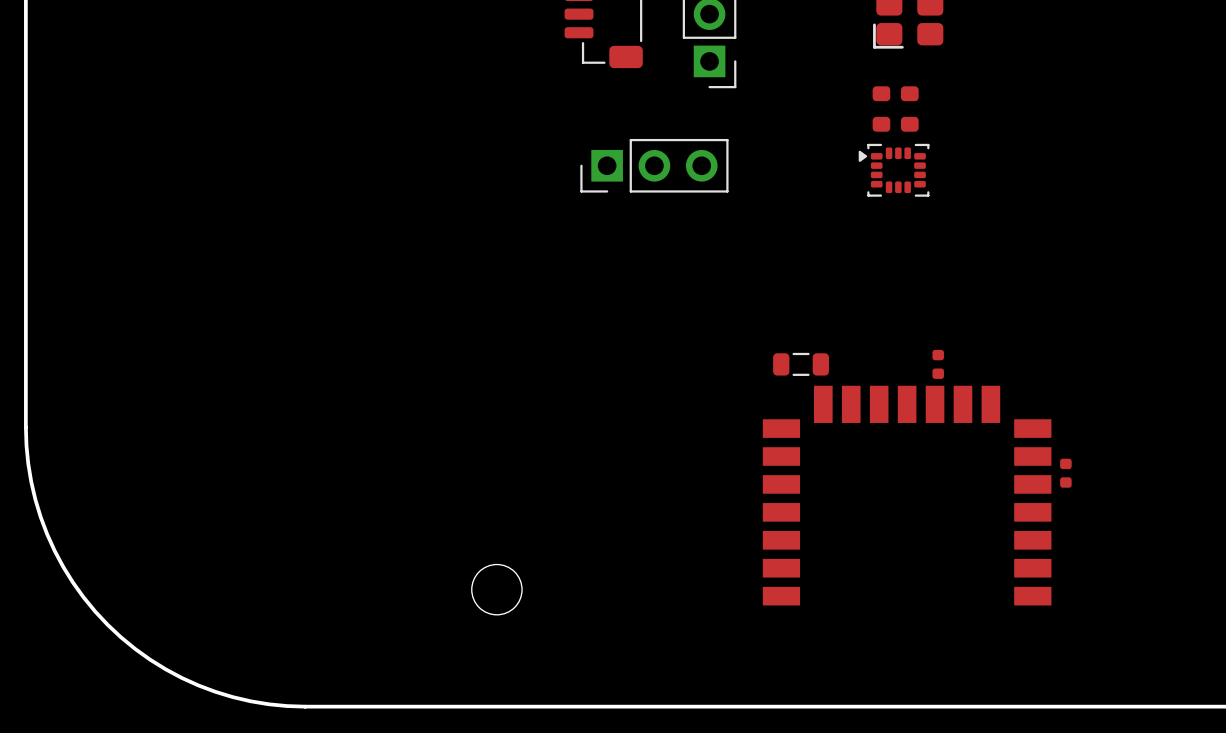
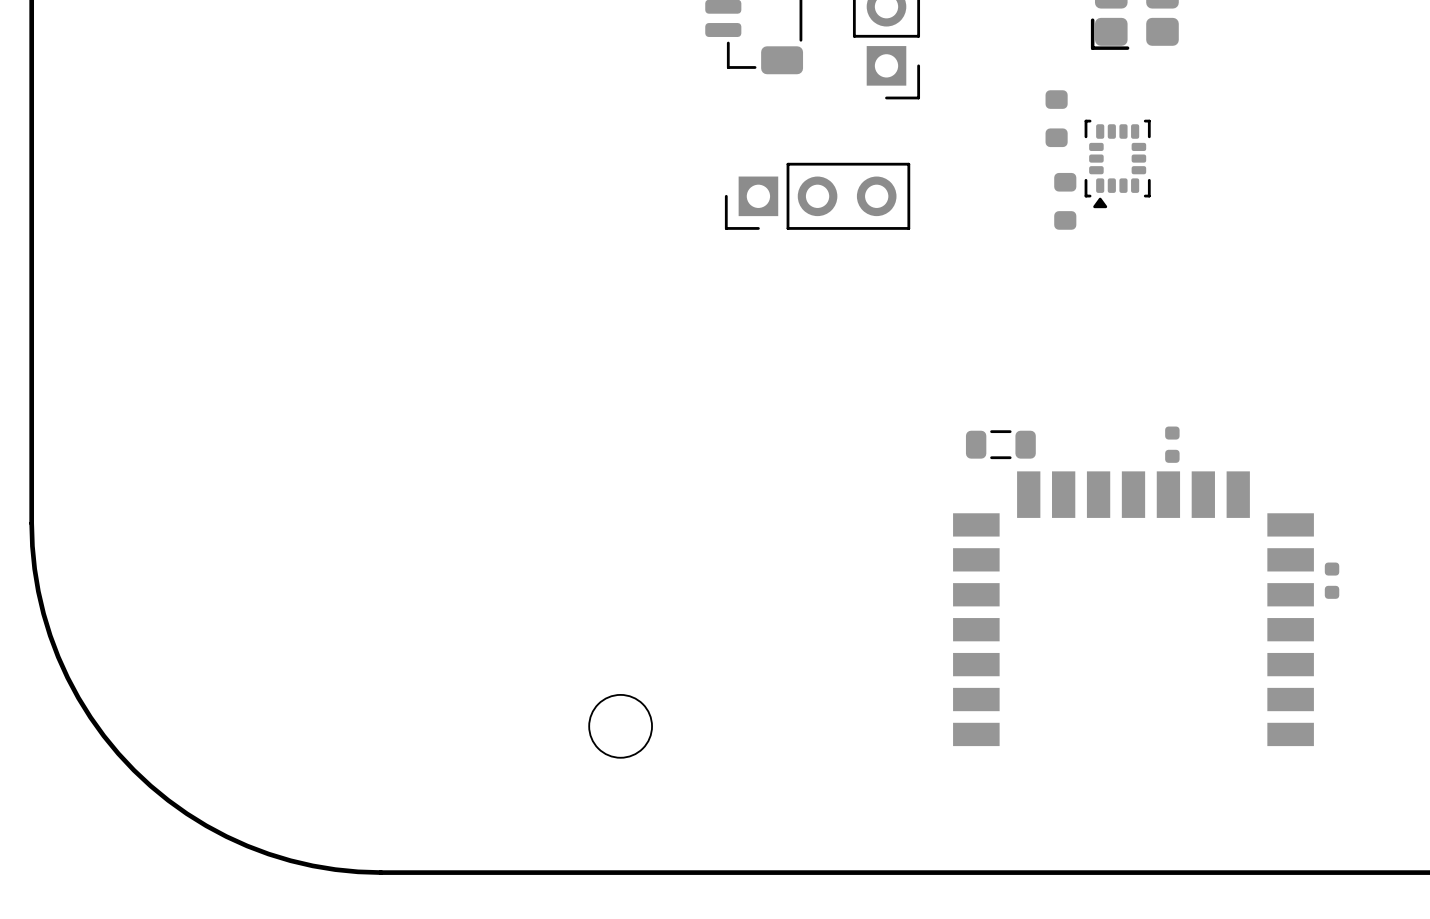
part: none -> (1056, 118)
part: (881, 109) -> none
part: (909, 109) -> none
part: none -> (1065, 201)
part rotation: 0° (894, 170) -> 90° counterclockwise (1117, 163)

